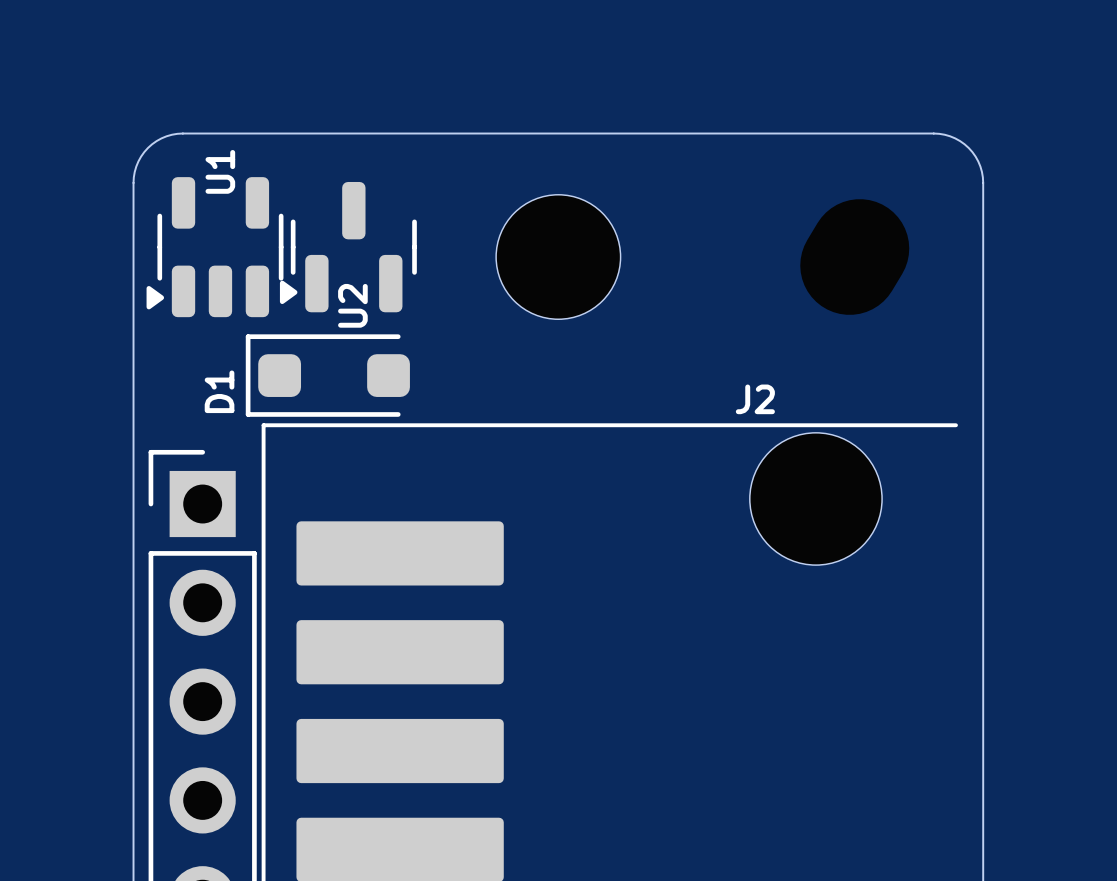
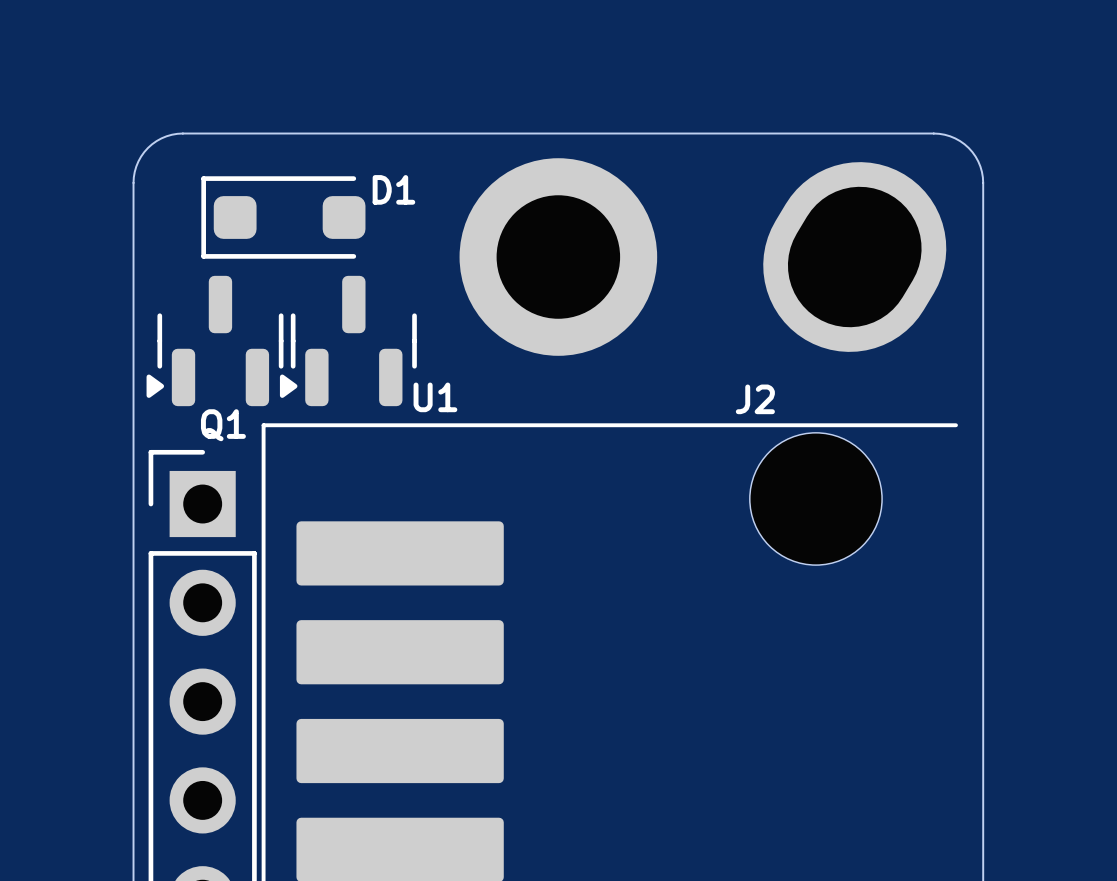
U1 name position: U1 (220, 171) -> U1 (435, 397)
U1 footprint: [146, 177, 284, 318] -> [279, 275, 417, 407]
part footprint: [496, 194, 621, 320] -> [459, 158, 658, 356]
part footprint: [800, 199, 910, 315] -> [763, 162, 947, 352]
U2: (348, 247) -> none
Q1: none -> (215, 340)
D1 position: (327, 375) -> (283, 217)
D1 name rotation: 0° (219, 391) -> 90° clockwise (393, 189)
D1 name position: D1 (219, 391) -> D1 (393, 189)

